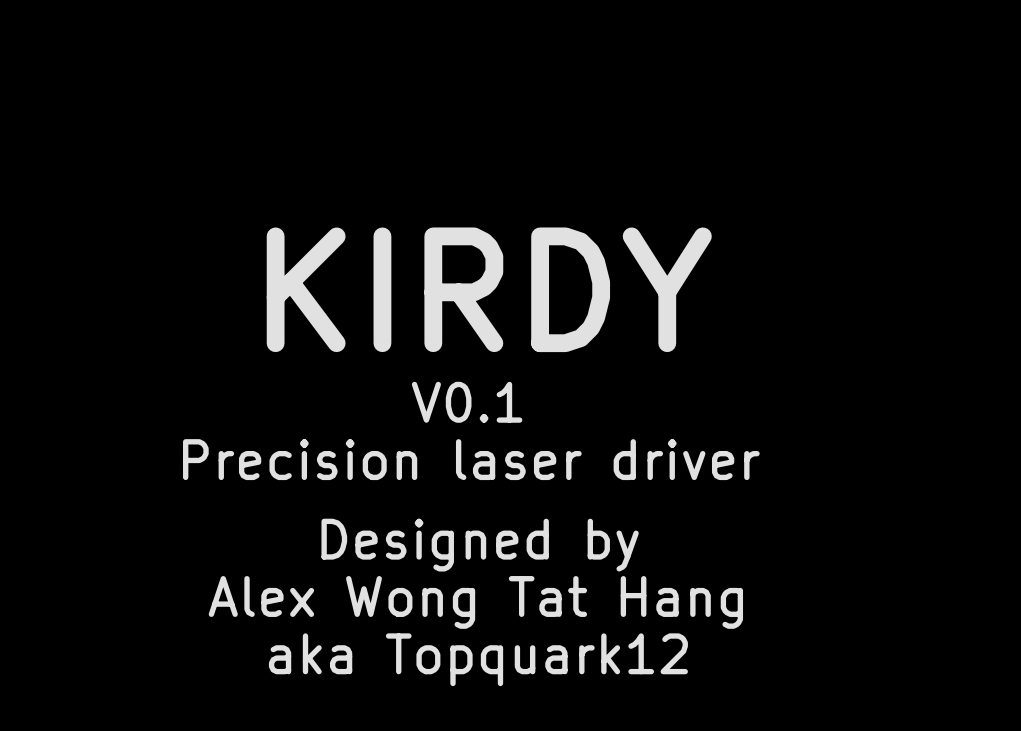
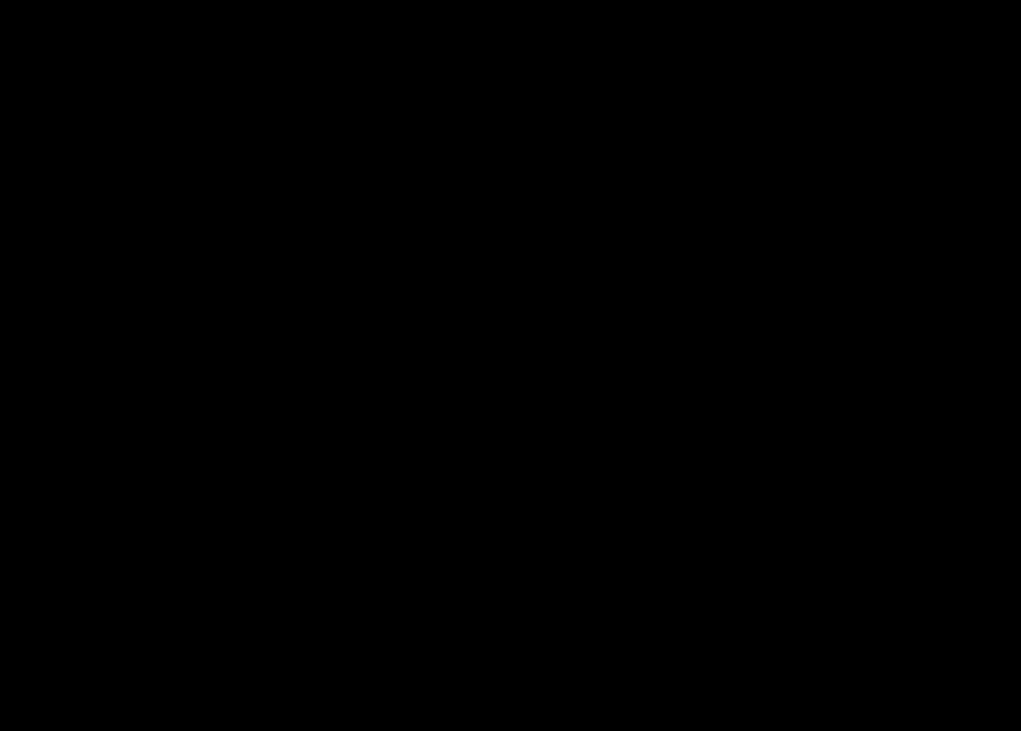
text: KIRDY (489, 289) -> none
text: V0.1 (467, 402) -> none
text: Precision laser driver (471, 459) -> none
text: Designed by (480, 545) -> none
text: Alex Wong Tat Hang (475, 602) -> none
text: aka Topquark12 (478, 659) -> none

